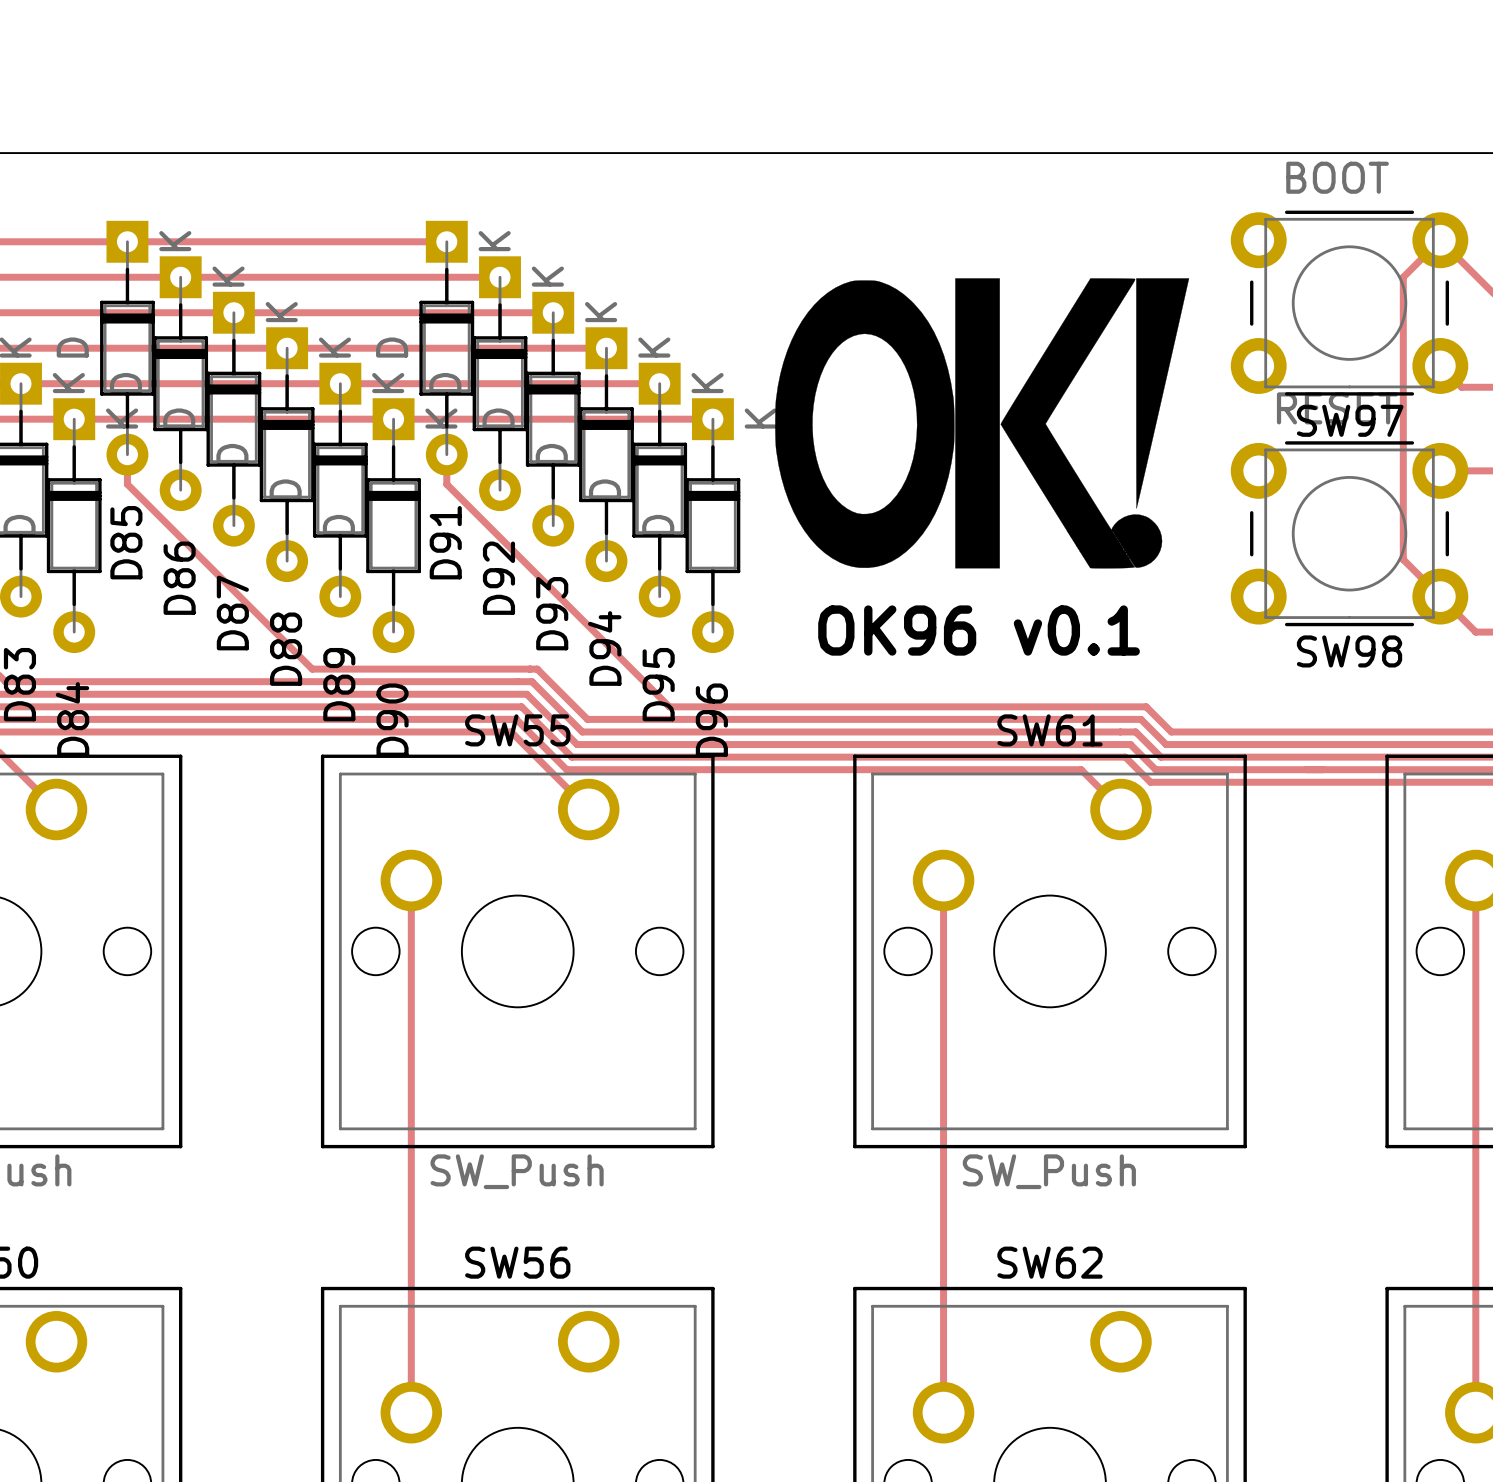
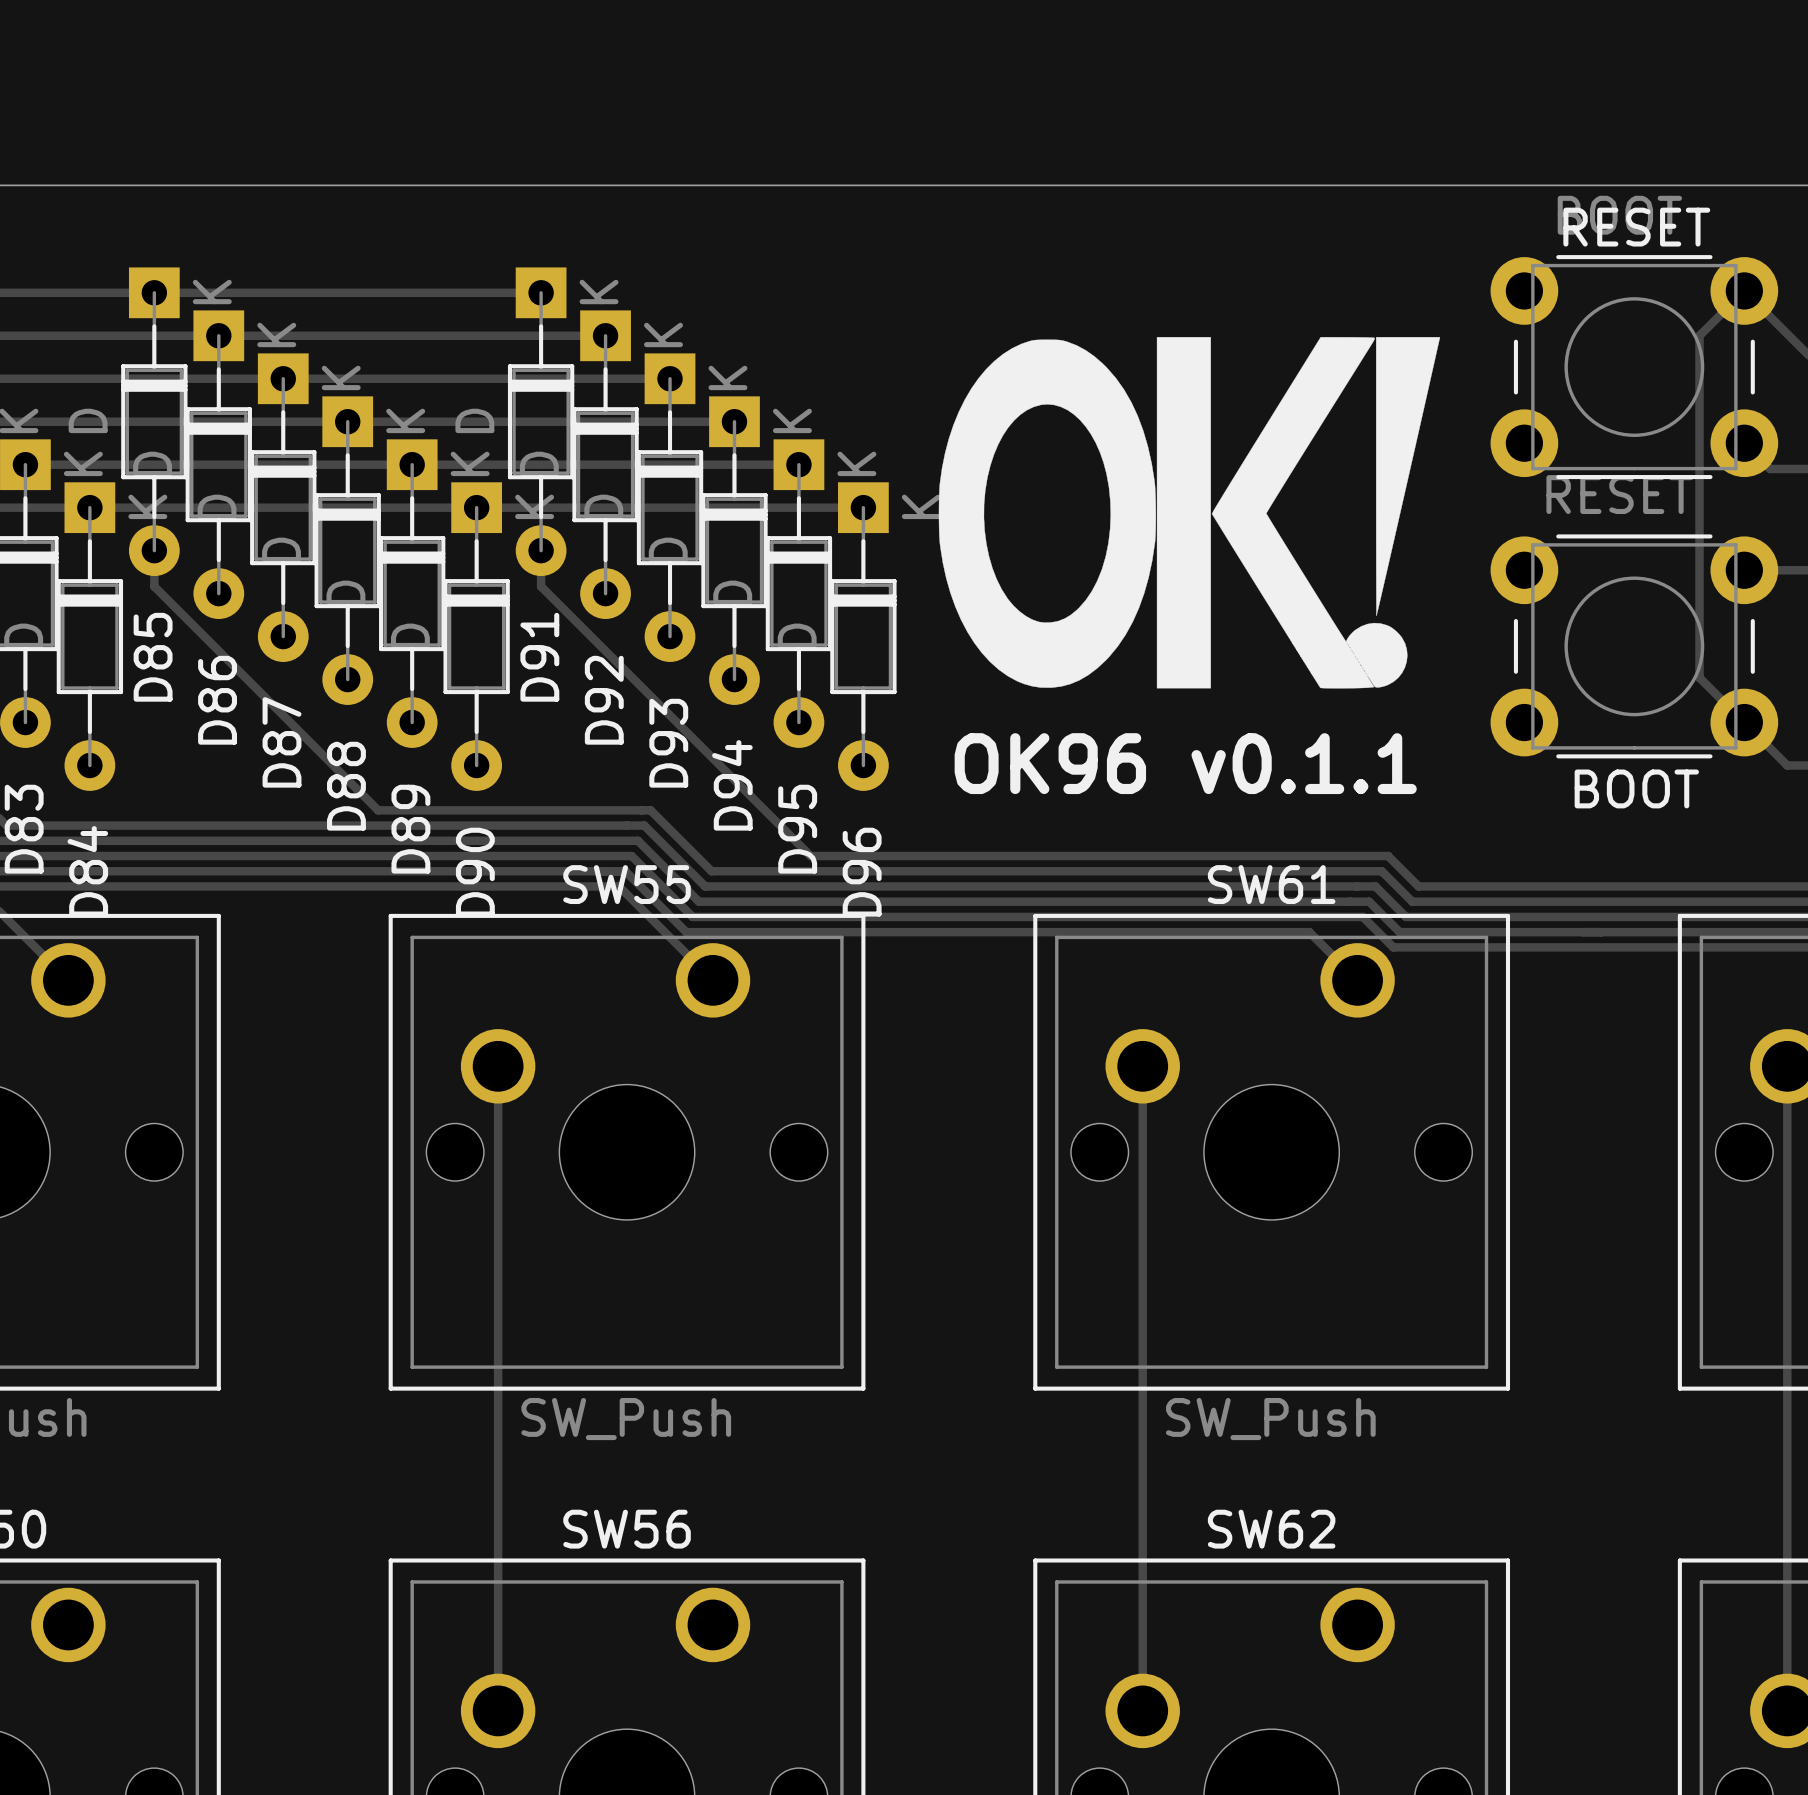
SW97 name: SW97 (1350, 420) -> RESET (1636, 227)
text: OK96 v0.1 (979, 630) -> OK96 v0.1.1 (1185, 763)
SW98 name: SW98 (1349, 651) -> BOOT (1636, 788)

